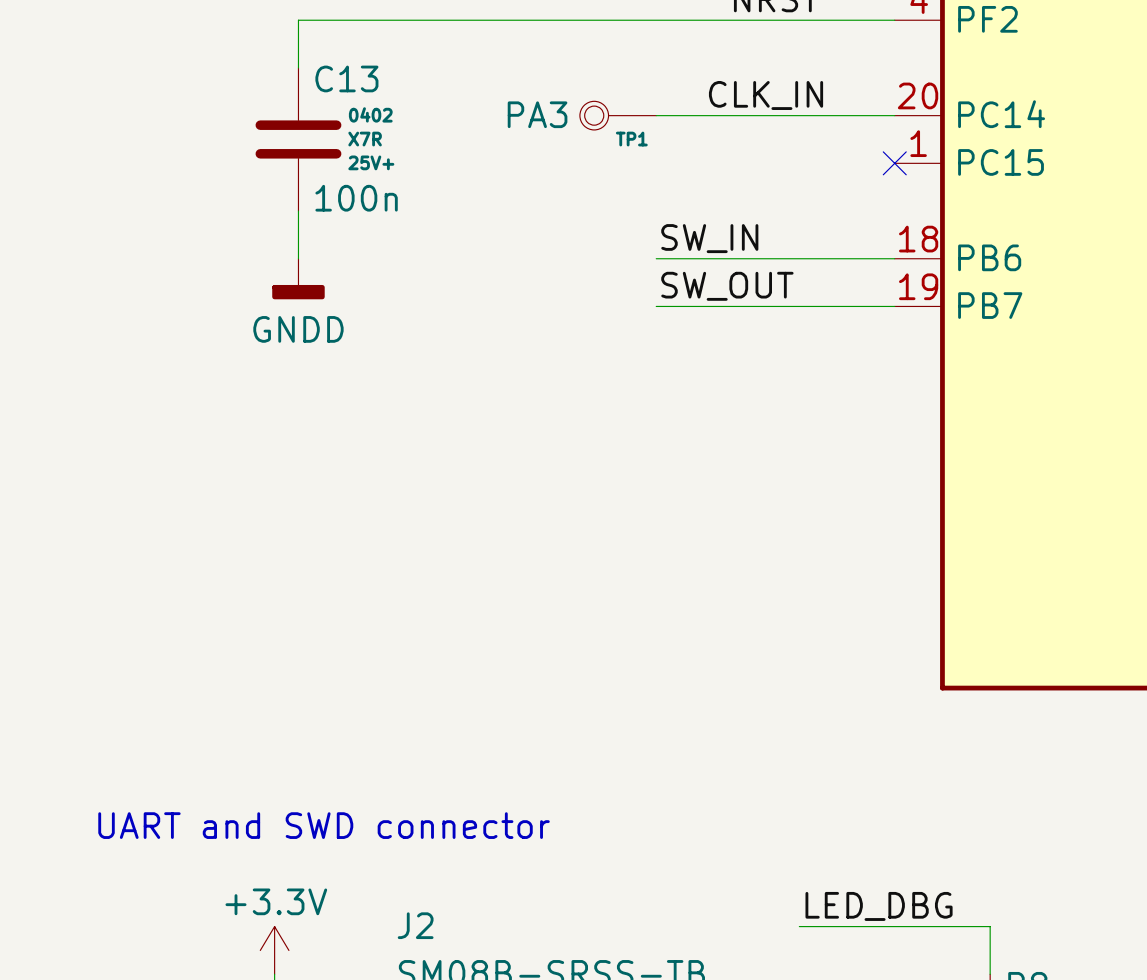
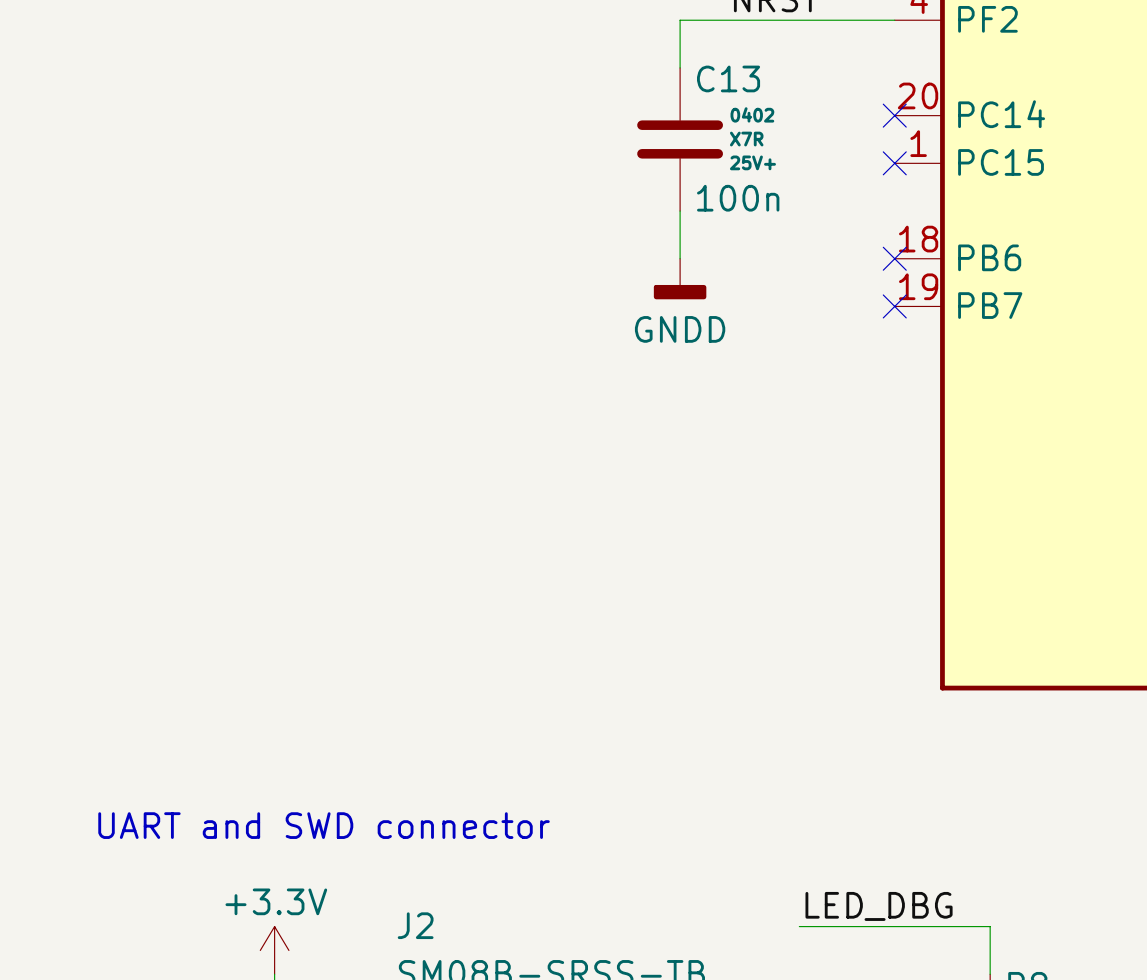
wire: (680, 20) (298, 20) (298, 67) -> (680, 20) (680, 67)
label: CLK_IN (766, 95) -> none
TP1: PA3 (618, 115) -> none
wire: (656, 115) (894, 115) -> none
no-connect mark: none -> (894, 115)
C13 position: (298, 139) -> (680, 139)
wire: (298, 211) (298, 258) -> (680, 211) (680, 258)
label: SW_IN (709, 238) -> none
wire: (656, 258) (894, 258) -> none
no-connect mark: none -> (894, 258)
power symbol: GNDD (298, 279) -> none
power symbol: none -> GNDD (680, 279)
label: SW_OUT (727, 286) -> none
wire: (656, 306) (894, 306) -> none
no-connect mark: none -> (894, 306)

